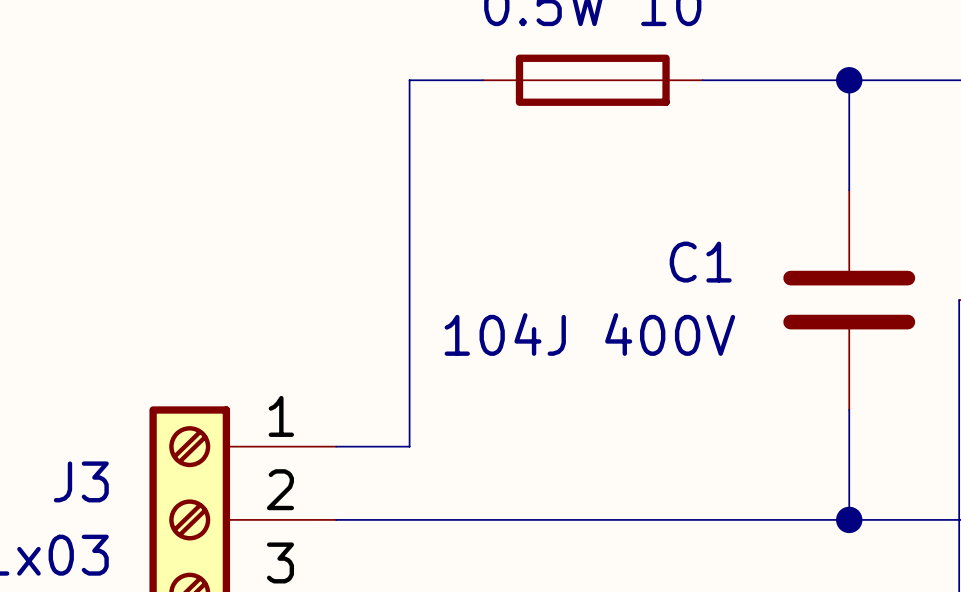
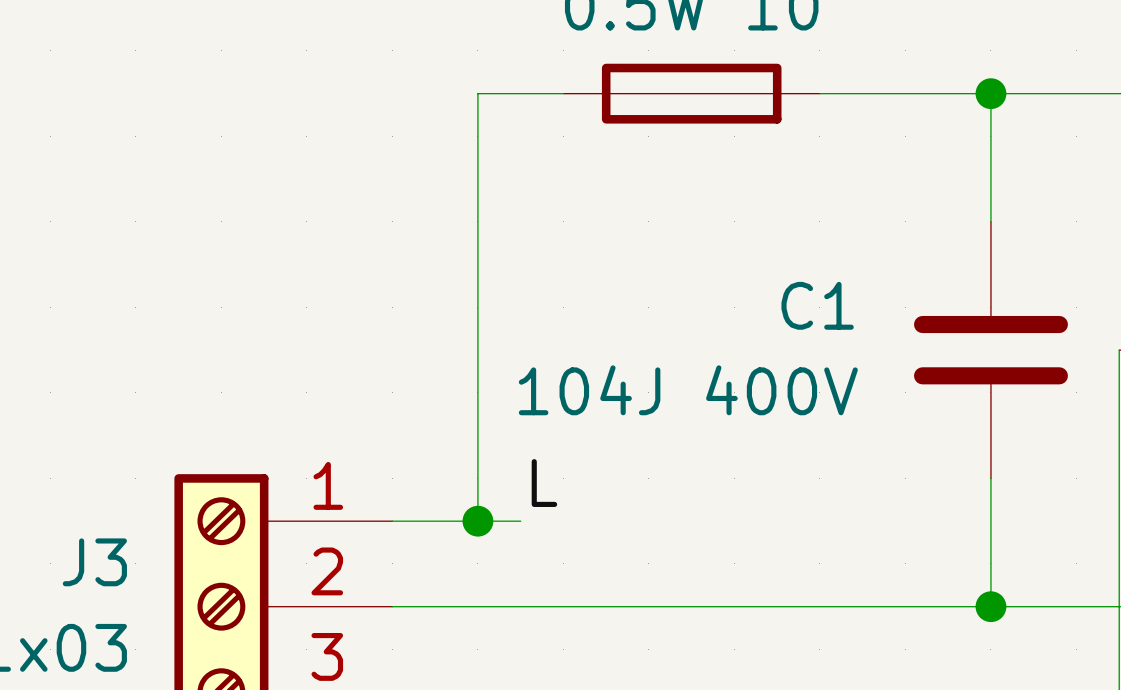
label: none -> L (544, 483)
wire: none -> (477, 521) (520, 521)
junction: none -> (477, 521)

